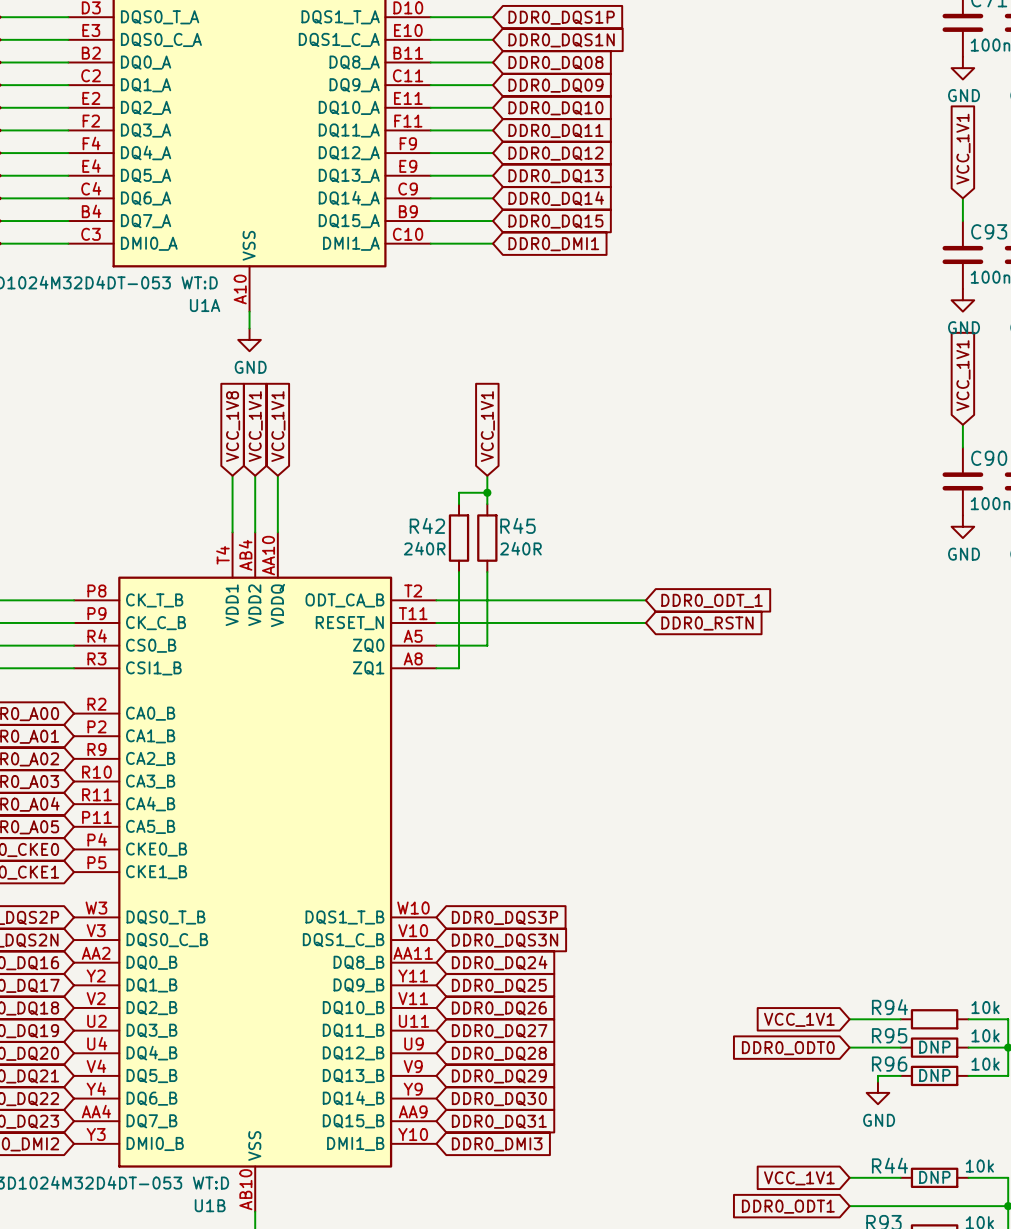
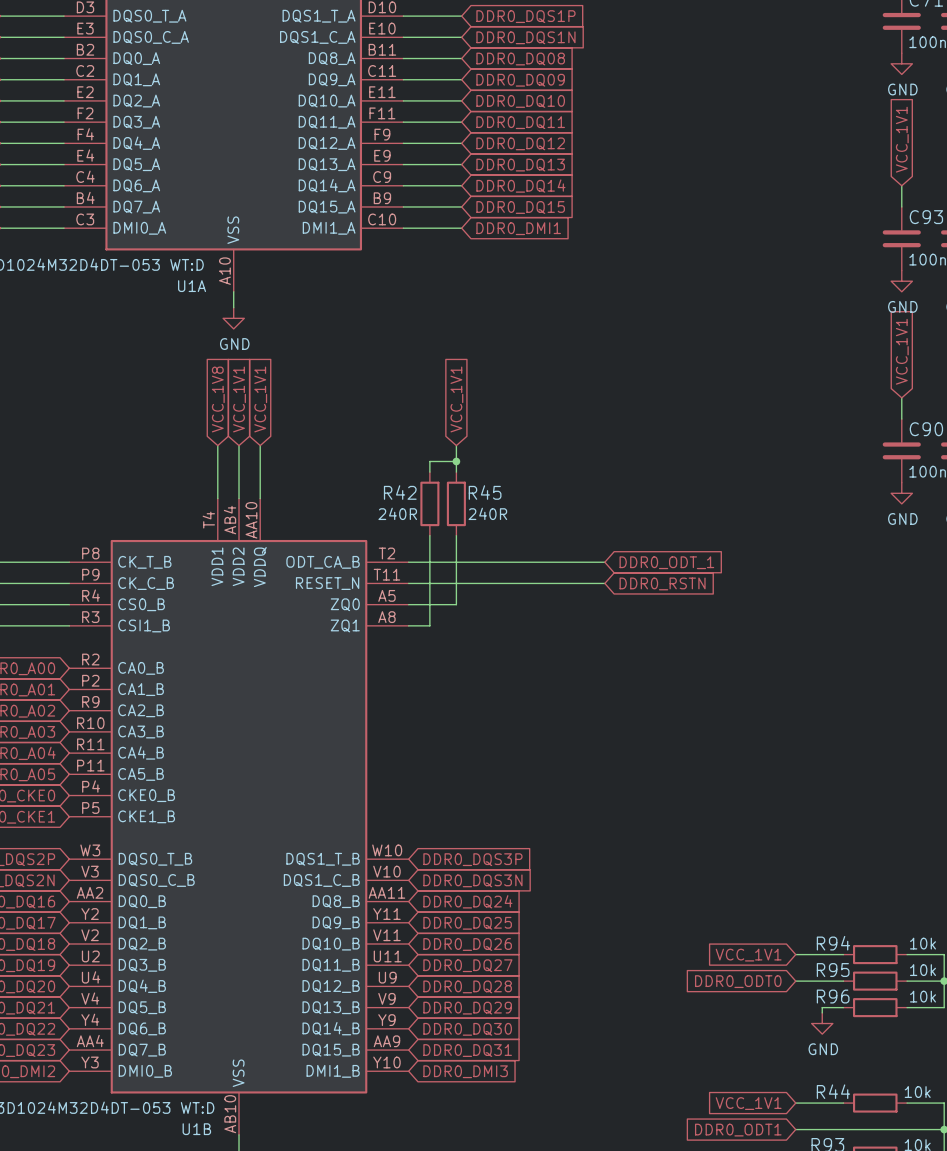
R95 text: DNP (934, 1047) -> none
R96 text: DNP (934, 1075) -> none
R44 text: DNP (934, 1177) -> none

